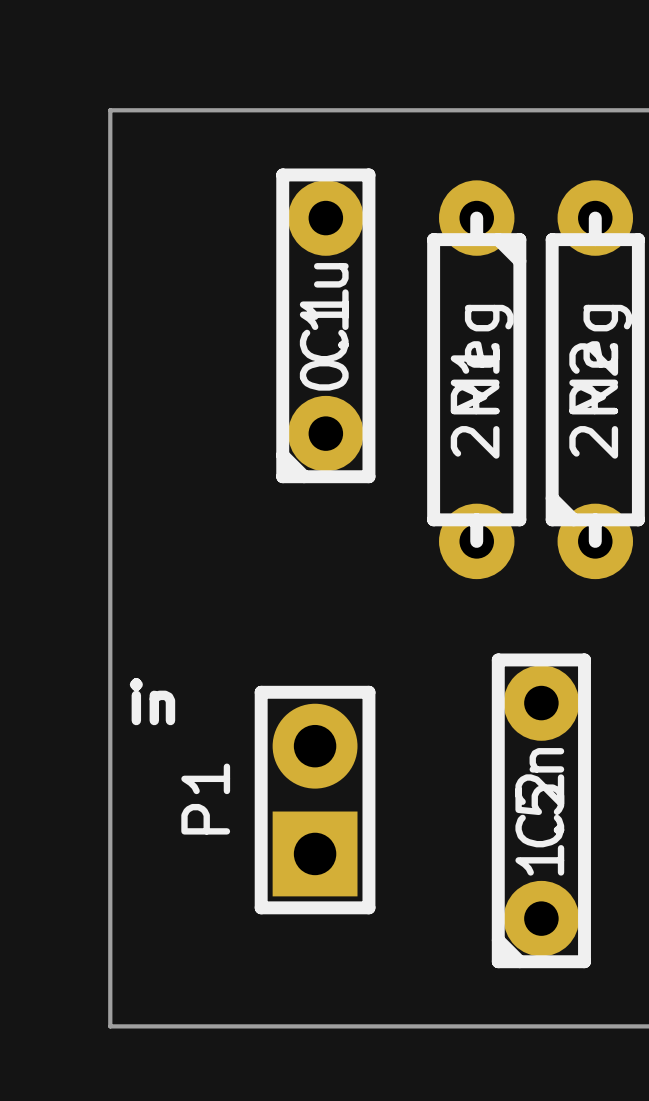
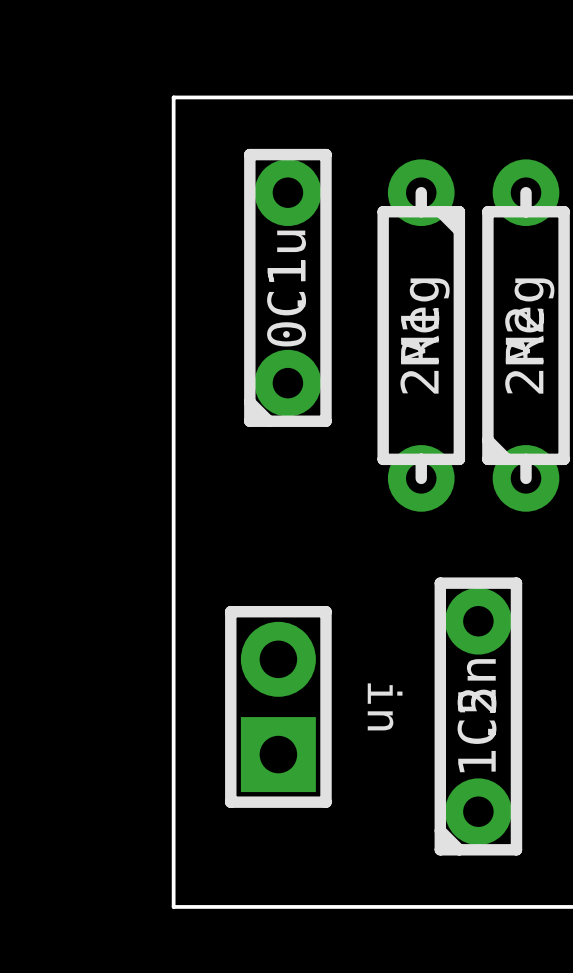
board edge: (196, 110) (110, 110) (110, 1026) (196, 1026) -> (173, 97) (173, 906)
text rotation: 0° (152, 701) -> 90° clockwise (385, 706)
text position: in (152, 701) -> in (385, 706)
P1 name: P1 (205, 799) -> none

